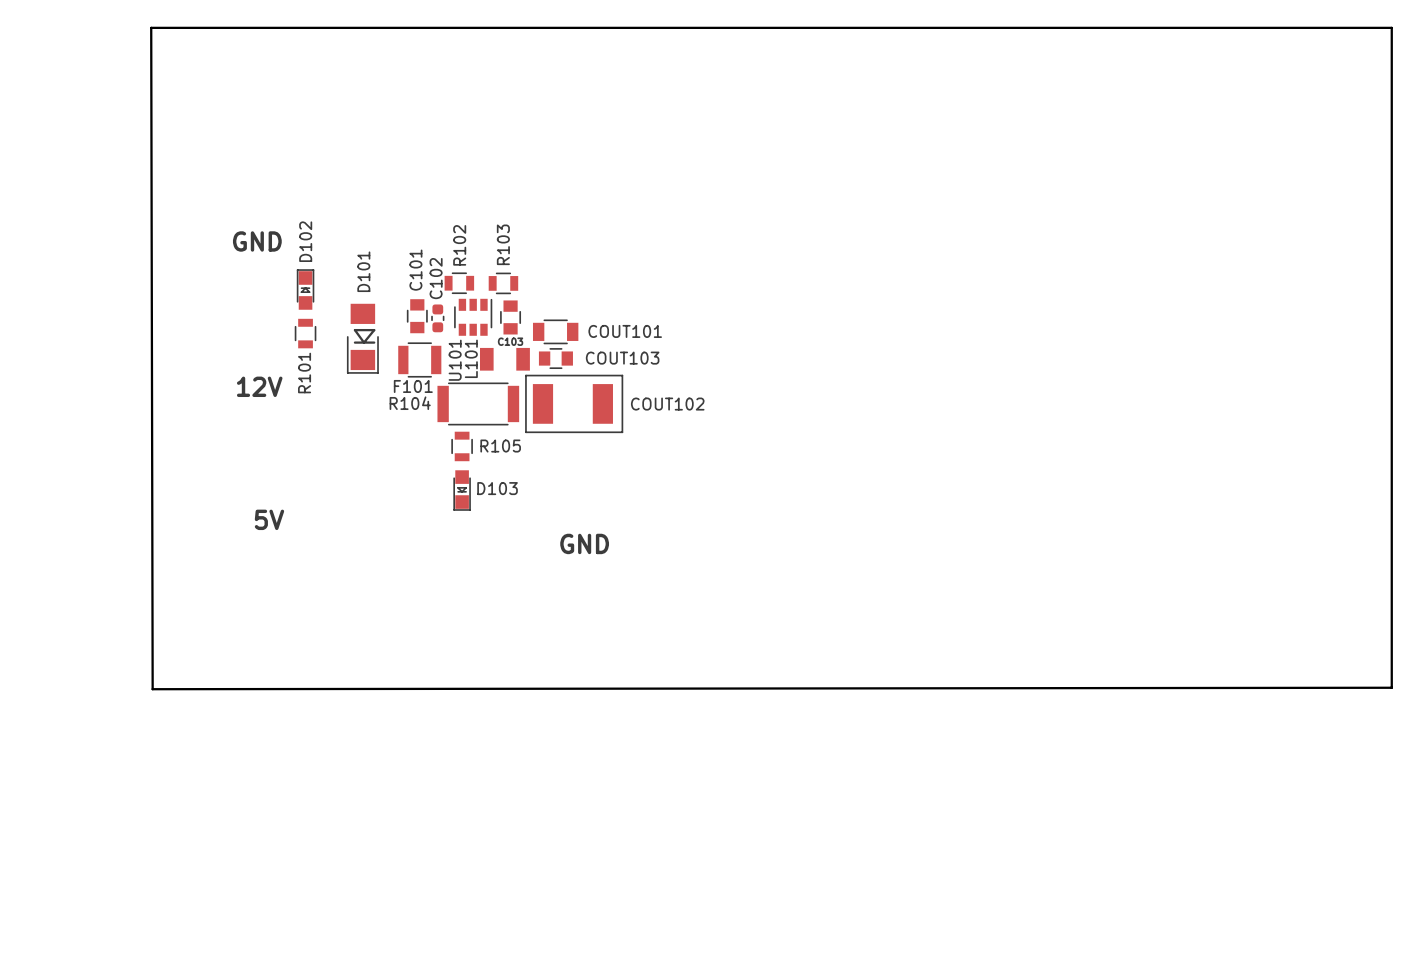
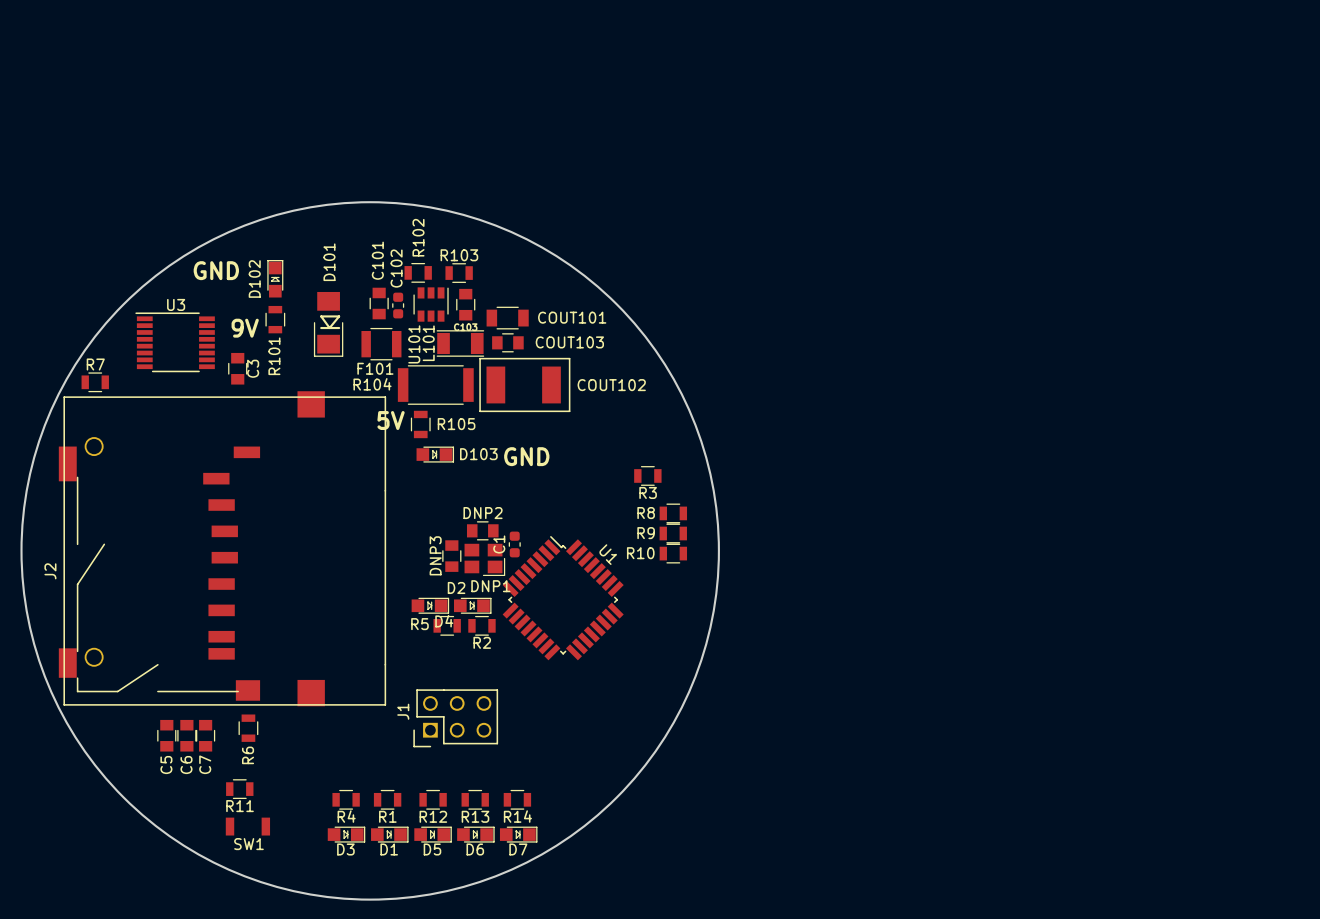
board edge: (151, 27) (152, 689) (1391, 687) (1391, 27) (151, 27) -> none
round board edge: none -> [20, 201, 720, 901]
text position: GND (257, 241) -> GND (216, 270)
D102 name position: D102 (305, 241) -> D102 (254, 279)
R103 name rotation: 0° (503, 244) -> 90° clockwise (459, 255)
text: none -> 9V (245, 328)
L101 footprint: [479, 347, 530, 371] -> [436, 330, 485, 357]
U3: none -> (175, 342)
text: 12V (259, 386) -> none
C3: none -> (237, 368)
R7: none -> (95, 382)
D103 rotation: 0° (462, 490) -> 90° counterclockwise (435, 454)
R3: none -> (647, 475)
text position: 5V (269, 519) -> 5V (391, 420)
R8: none -> (673, 513)
text position: GND (584, 543) -> GND (526, 456)
DNP2: none -> (482, 530)
R9: none -> (673, 533)
C1: none -> (514, 544)
J2: none -> (222, 548)
R10: none -> (673, 553)
DNP3: none -> (451, 556)
DNP1: none -> (484, 559)
U1: none -> (563, 598)
D4: none -> (430, 605)
D2: none -> (472, 605)
R5: none -> (447, 625)
R2: none -> (481, 625)
J1: none -> (455, 718)
R6: none -> (248, 728)
C5: none -> (166, 735)
C6: none -> (186, 735)
C7: none -> (205, 735)
R11: none -> (239, 789)
R4: none -> (346, 799)
R1: none -> (387, 799)
R12: none -> (433, 799)
R13: none -> (475, 799)
R14: none -> (517, 799)
SW1: none -> (247, 826)
D3: none -> (346, 834)
D1: none -> (389, 834)
D5: none -> (433, 834)
D6: none -> (475, 834)
D7: none -> (518, 834)

